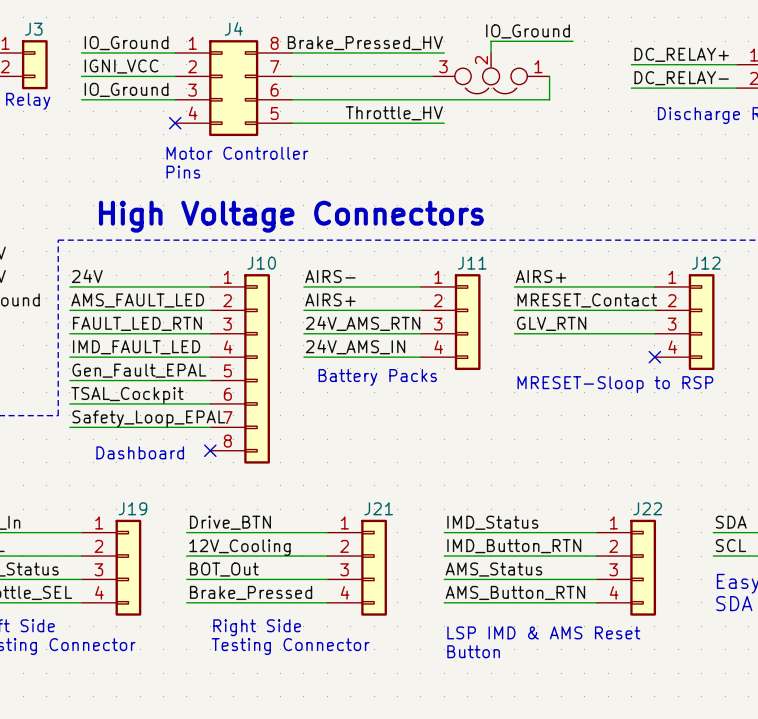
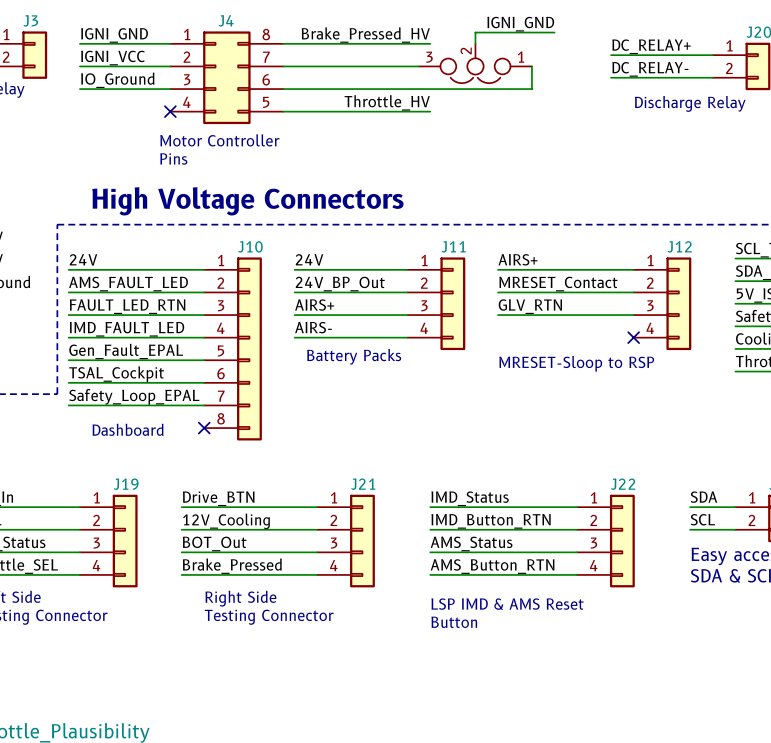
label: IO_Ground (528, 31) -> IGNI_GND (520, 24)
label: IO_Ground (126, 43) -> IGNI_GND (114, 35)
label: AIRS- (330, 276) -> 24V (309, 259)
label: AIRS+ (330, 299) -> 24V_BP_Out (340, 284)
label: 24V_AMS_RTN (363, 323) -> AIRS+ (314, 305)
label: 24V_AMS_IN (355, 346) -> AIRS- (313, 327)

